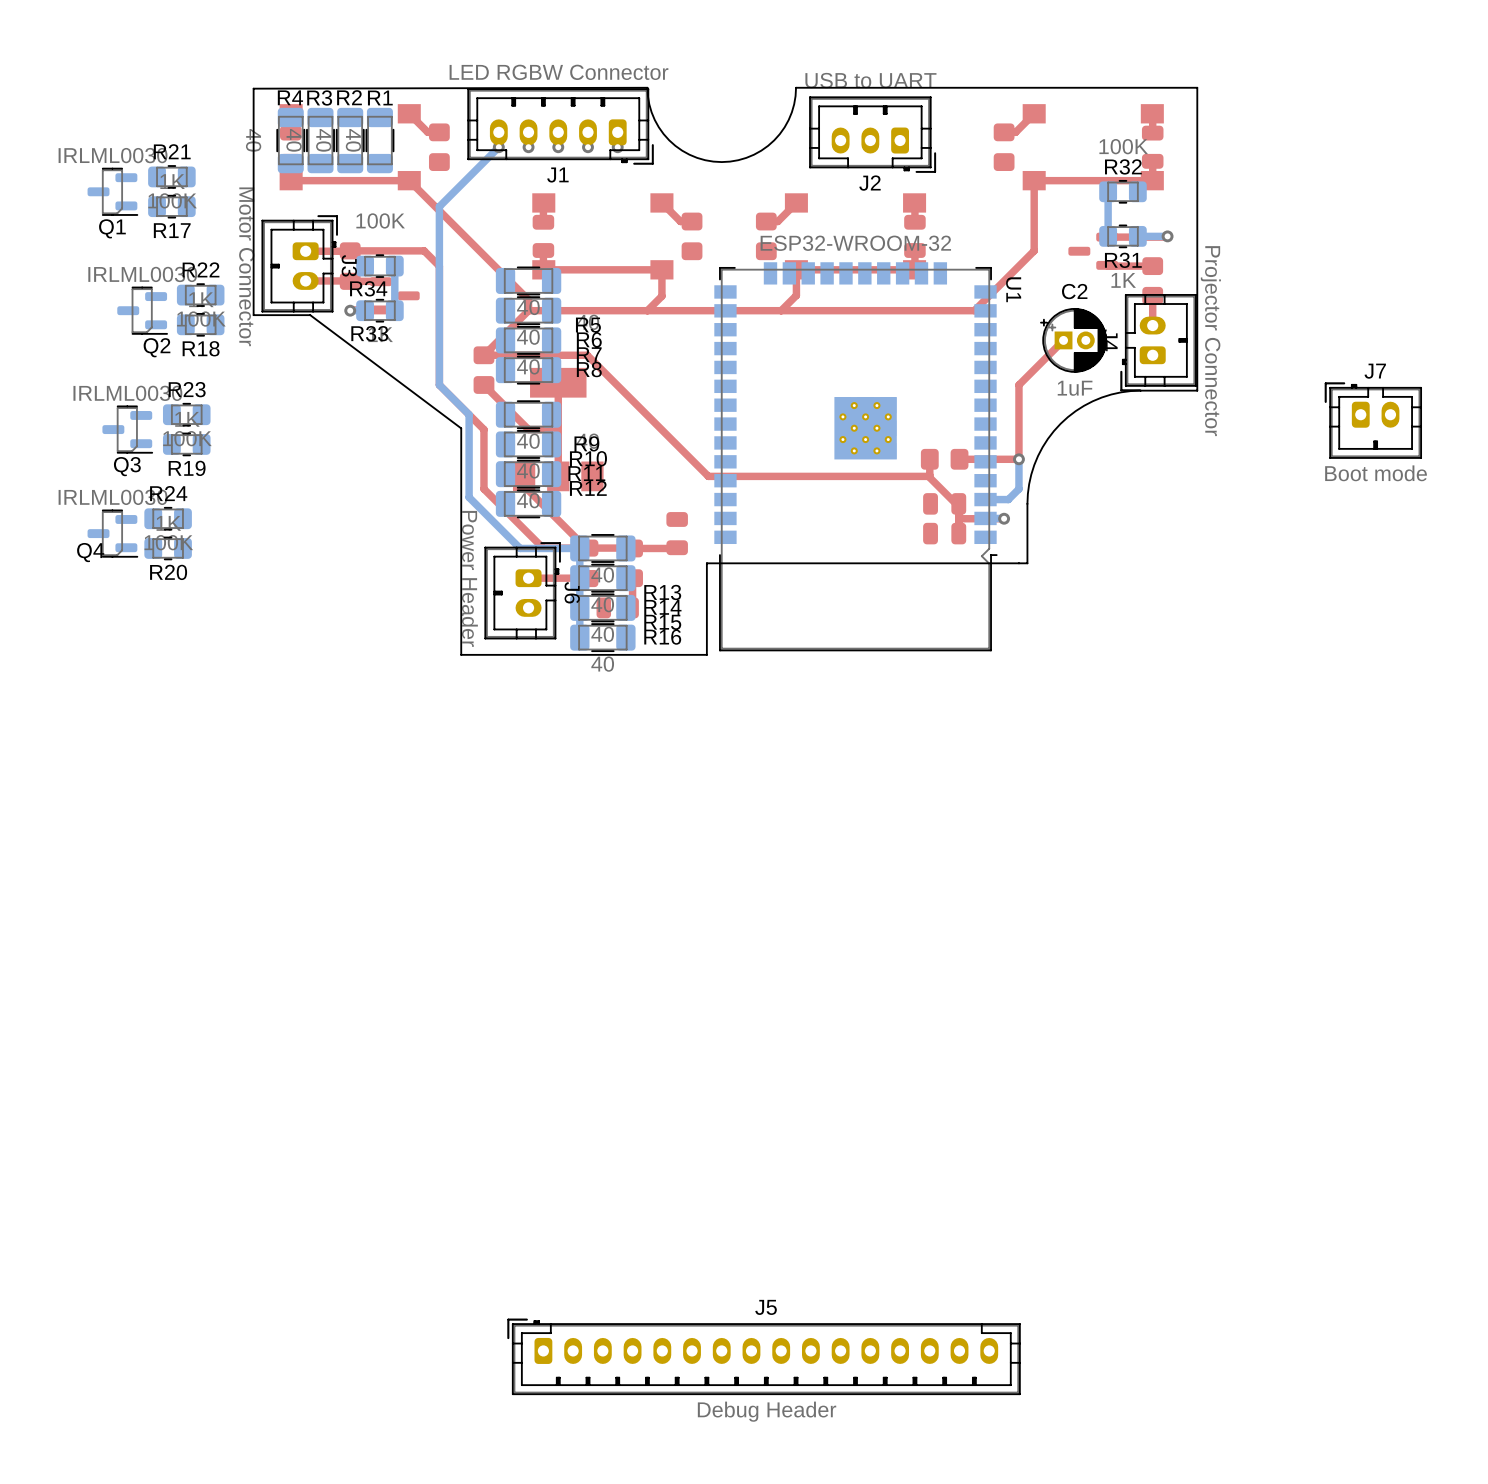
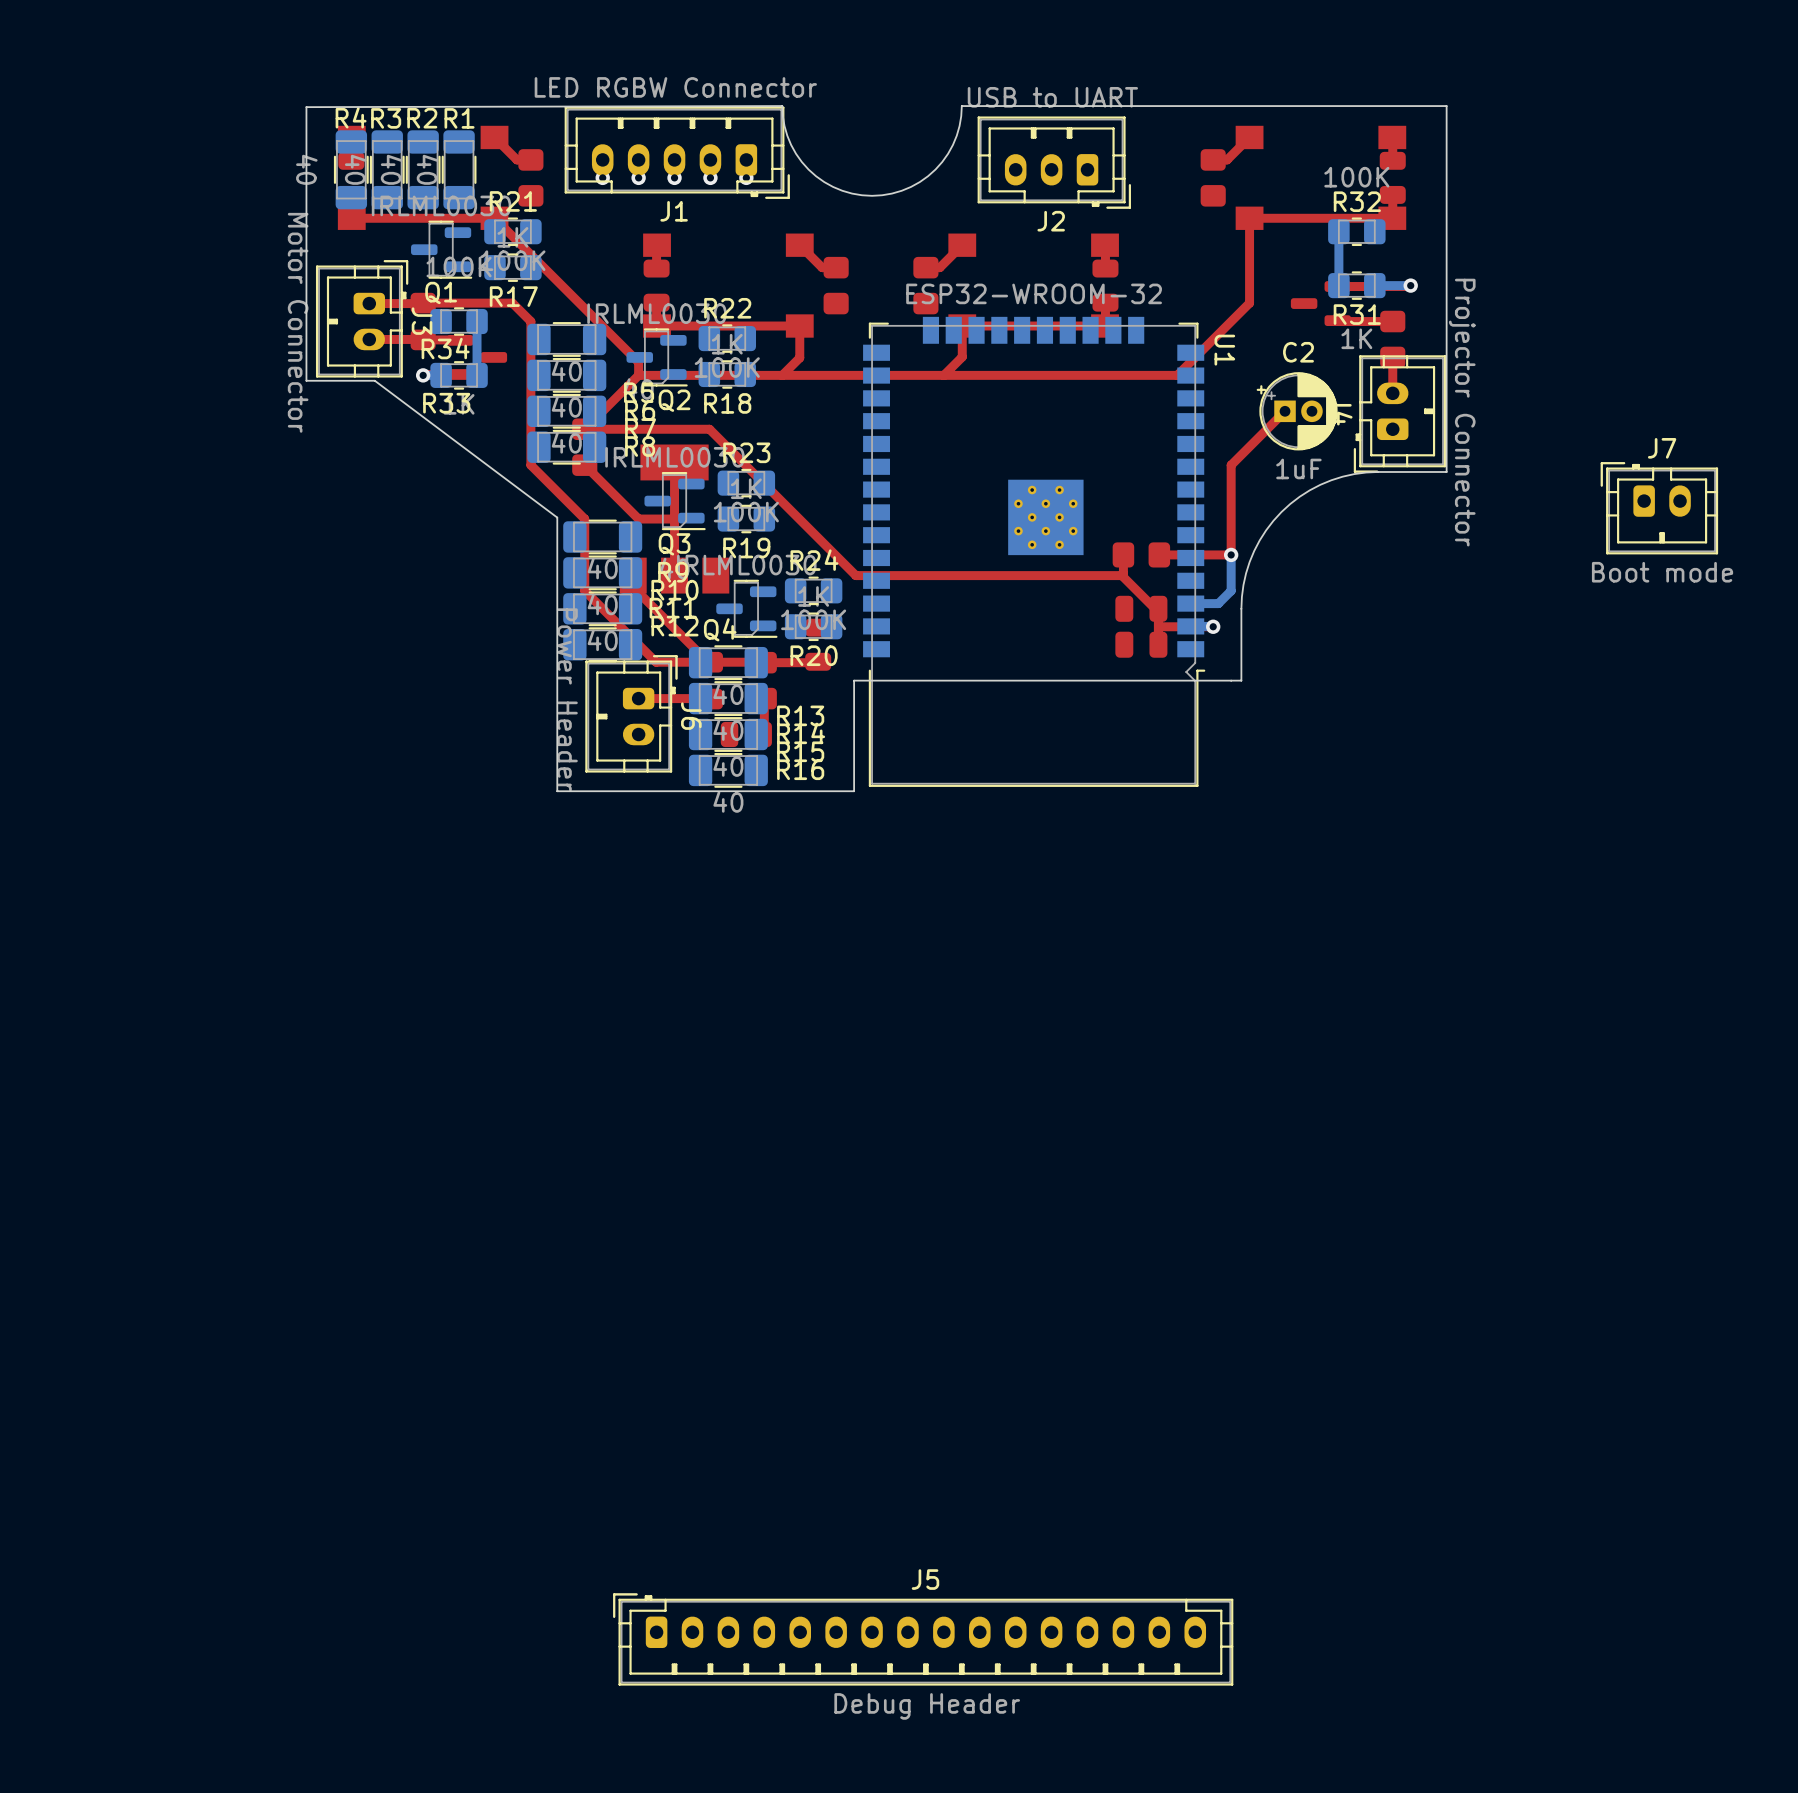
bottom track: (498, 147) (439, 206) (439, 384) (469, 414) (469, 497) (520, 548) (579, 548) (579, 637) -> none
R21 position: (171, 176) -> (512, 231)
Q1 position: (112, 191) -> (441, 249)
R17 position: (171, 206) -> (512, 267)
R5 position: (528, 280) -> (566, 339)
R22 position: (200, 295) -> (727, 338)
Q2 position: (142, 310) -> (657, 357)
R6 position: (528, 310) -> (566, 375)
R18 position: (200, 324) -> (727, 374)
R7 position: (528, 340) -> (566, 411)
R8 position: (528, 370) -> (566, 447)
R23 position: (186, 414) -> (746, 483)
R9 position: (528, 414) -> (602, 536)
Q3 position: (127, 429) -> (675, 501)
R19 position: (186, 444) -> (746, 519)
R10 position: (528, 444) -> (602, 572)
R11 position: (528, 474) -> (602, 608)
R12 position: (528, 503) -> (602, 644)
R24 position: (168, 518) -> (813, 590)
Q4 position: (112, 533) -> (746, 608)
R20 position: (168, 548) -> (813, 626)

